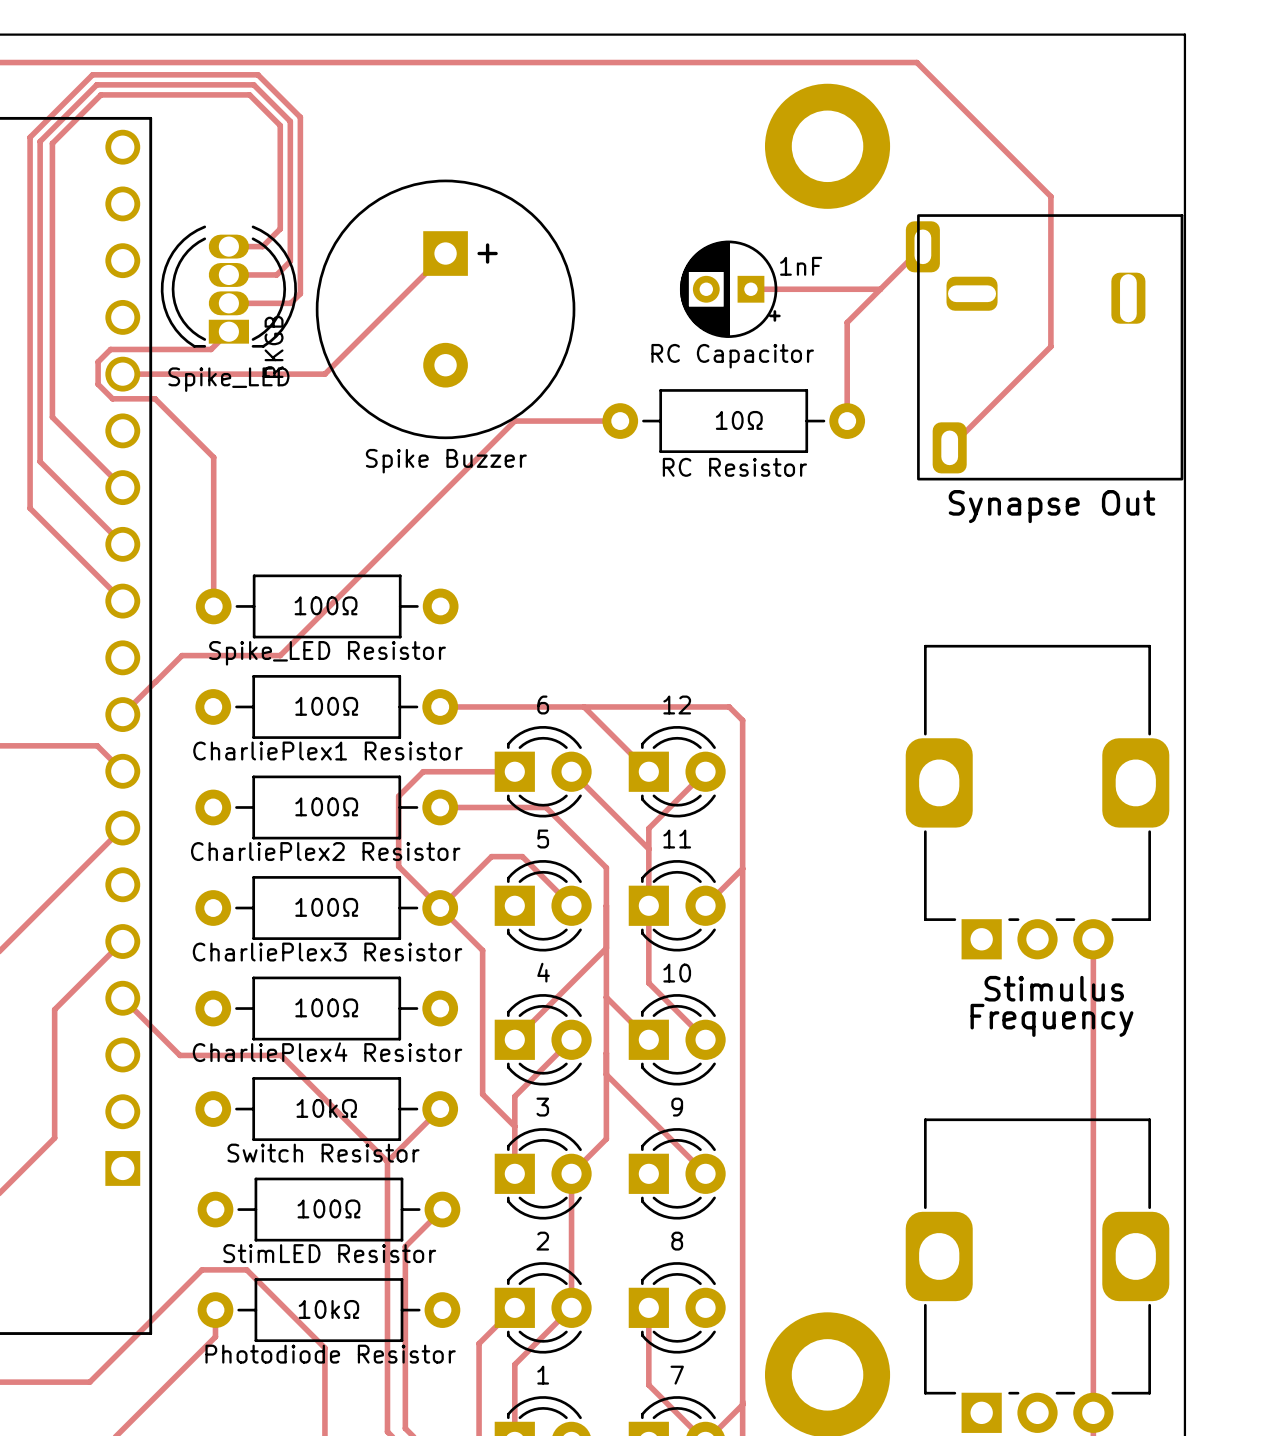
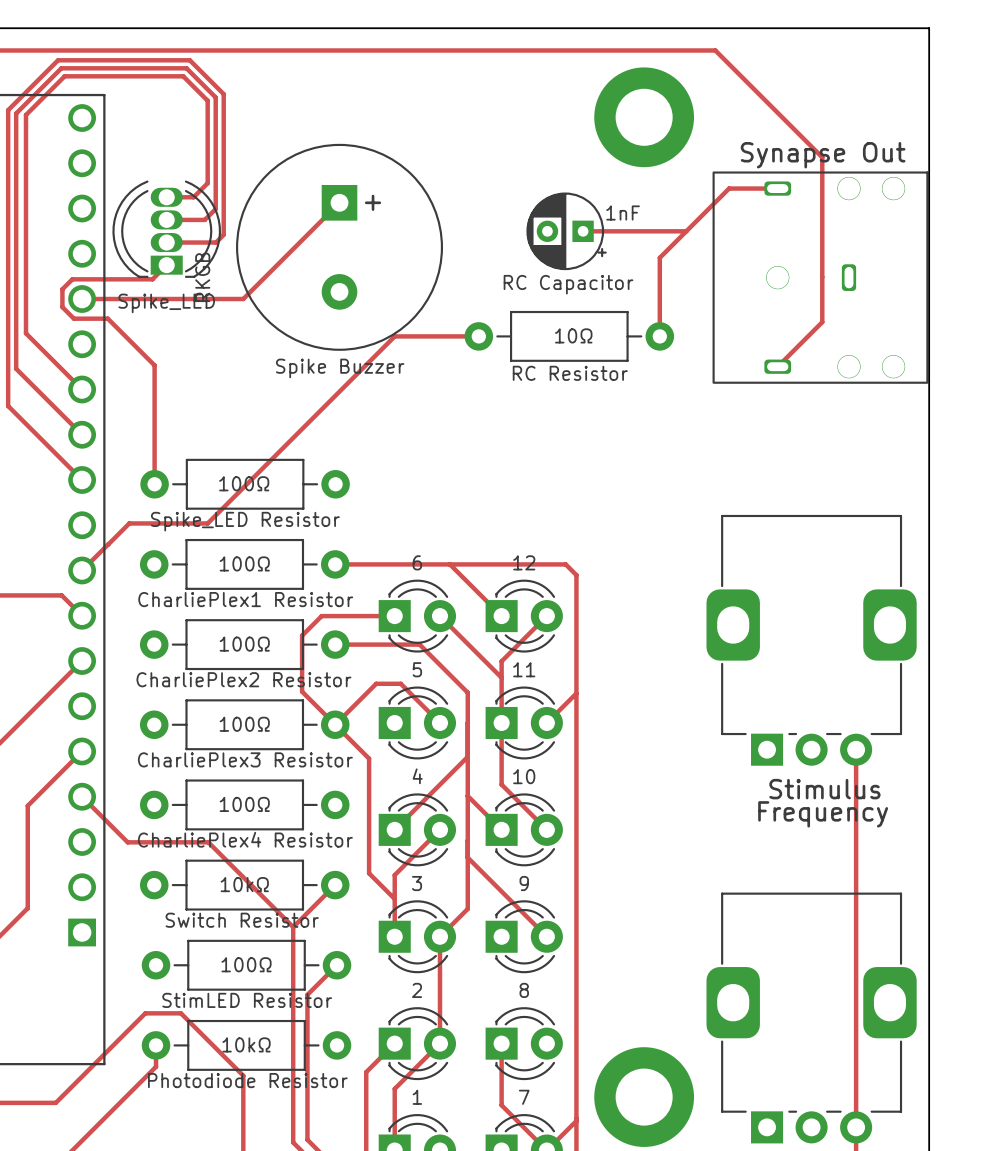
Synapse Out footprint: [905, 214, 1184, 481] -> [712, 171, 929, 384]
track: none -> (777, 188) (729, 188) (720, 197)
track: (1050, 346) (949, 447) -> (822, 277) (822, 322) (777, 366)
Synapse Out name position: Synapse Out (1051, 506) -> Synapse Out (823, 155)

